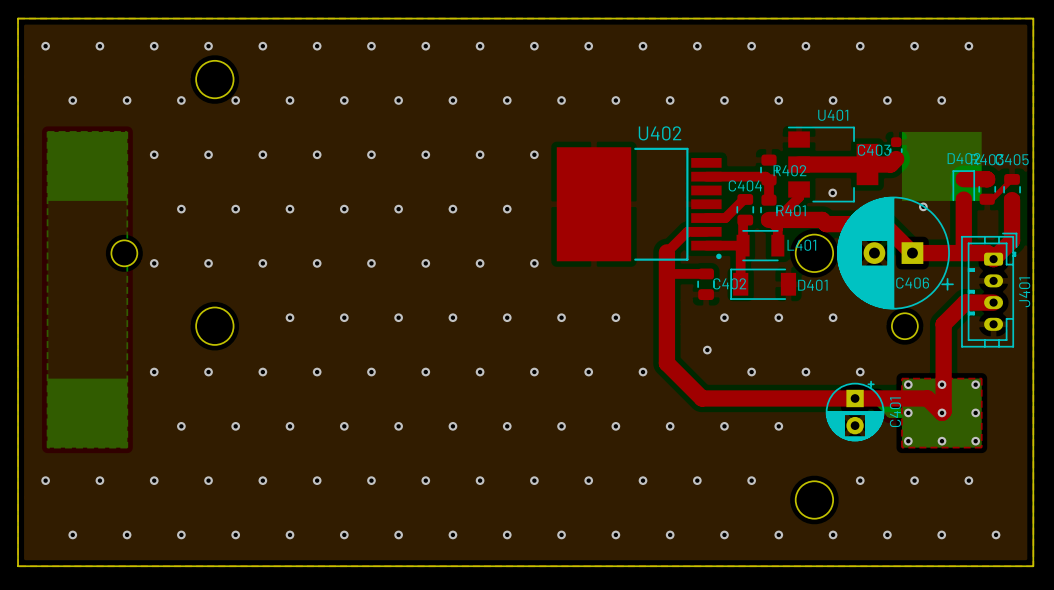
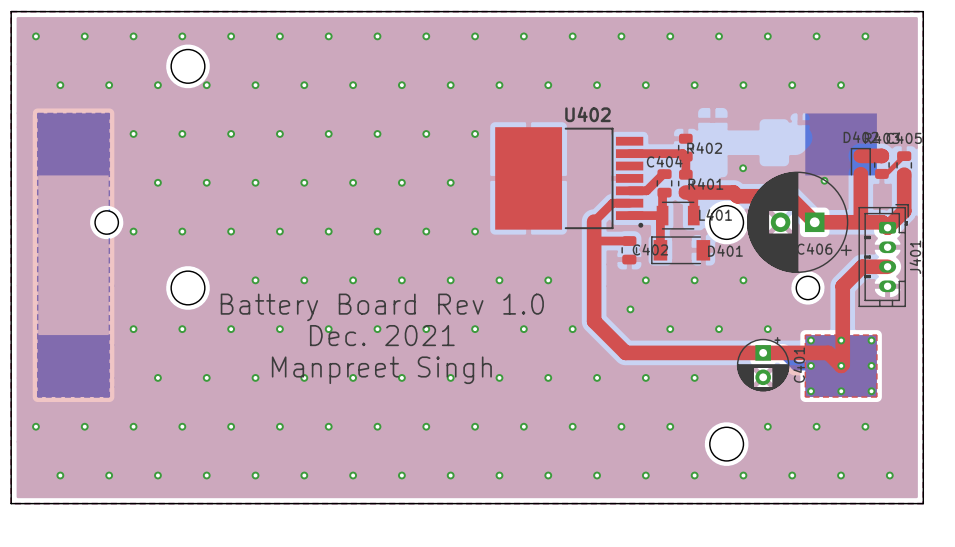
C403: (896, 150) -> none
top track: (896, 159) (890, 164) (799, 164) -> none
U401: (833, 164) -> none
top track: (799, 189) (799, 197) (776, 219) -> none
text: none -> Battery Board Rev 1.0 (382, 307)
text: none -> Dec. 2021 (382, 335)
text: none -> Manpreet Singh (381, 370)

